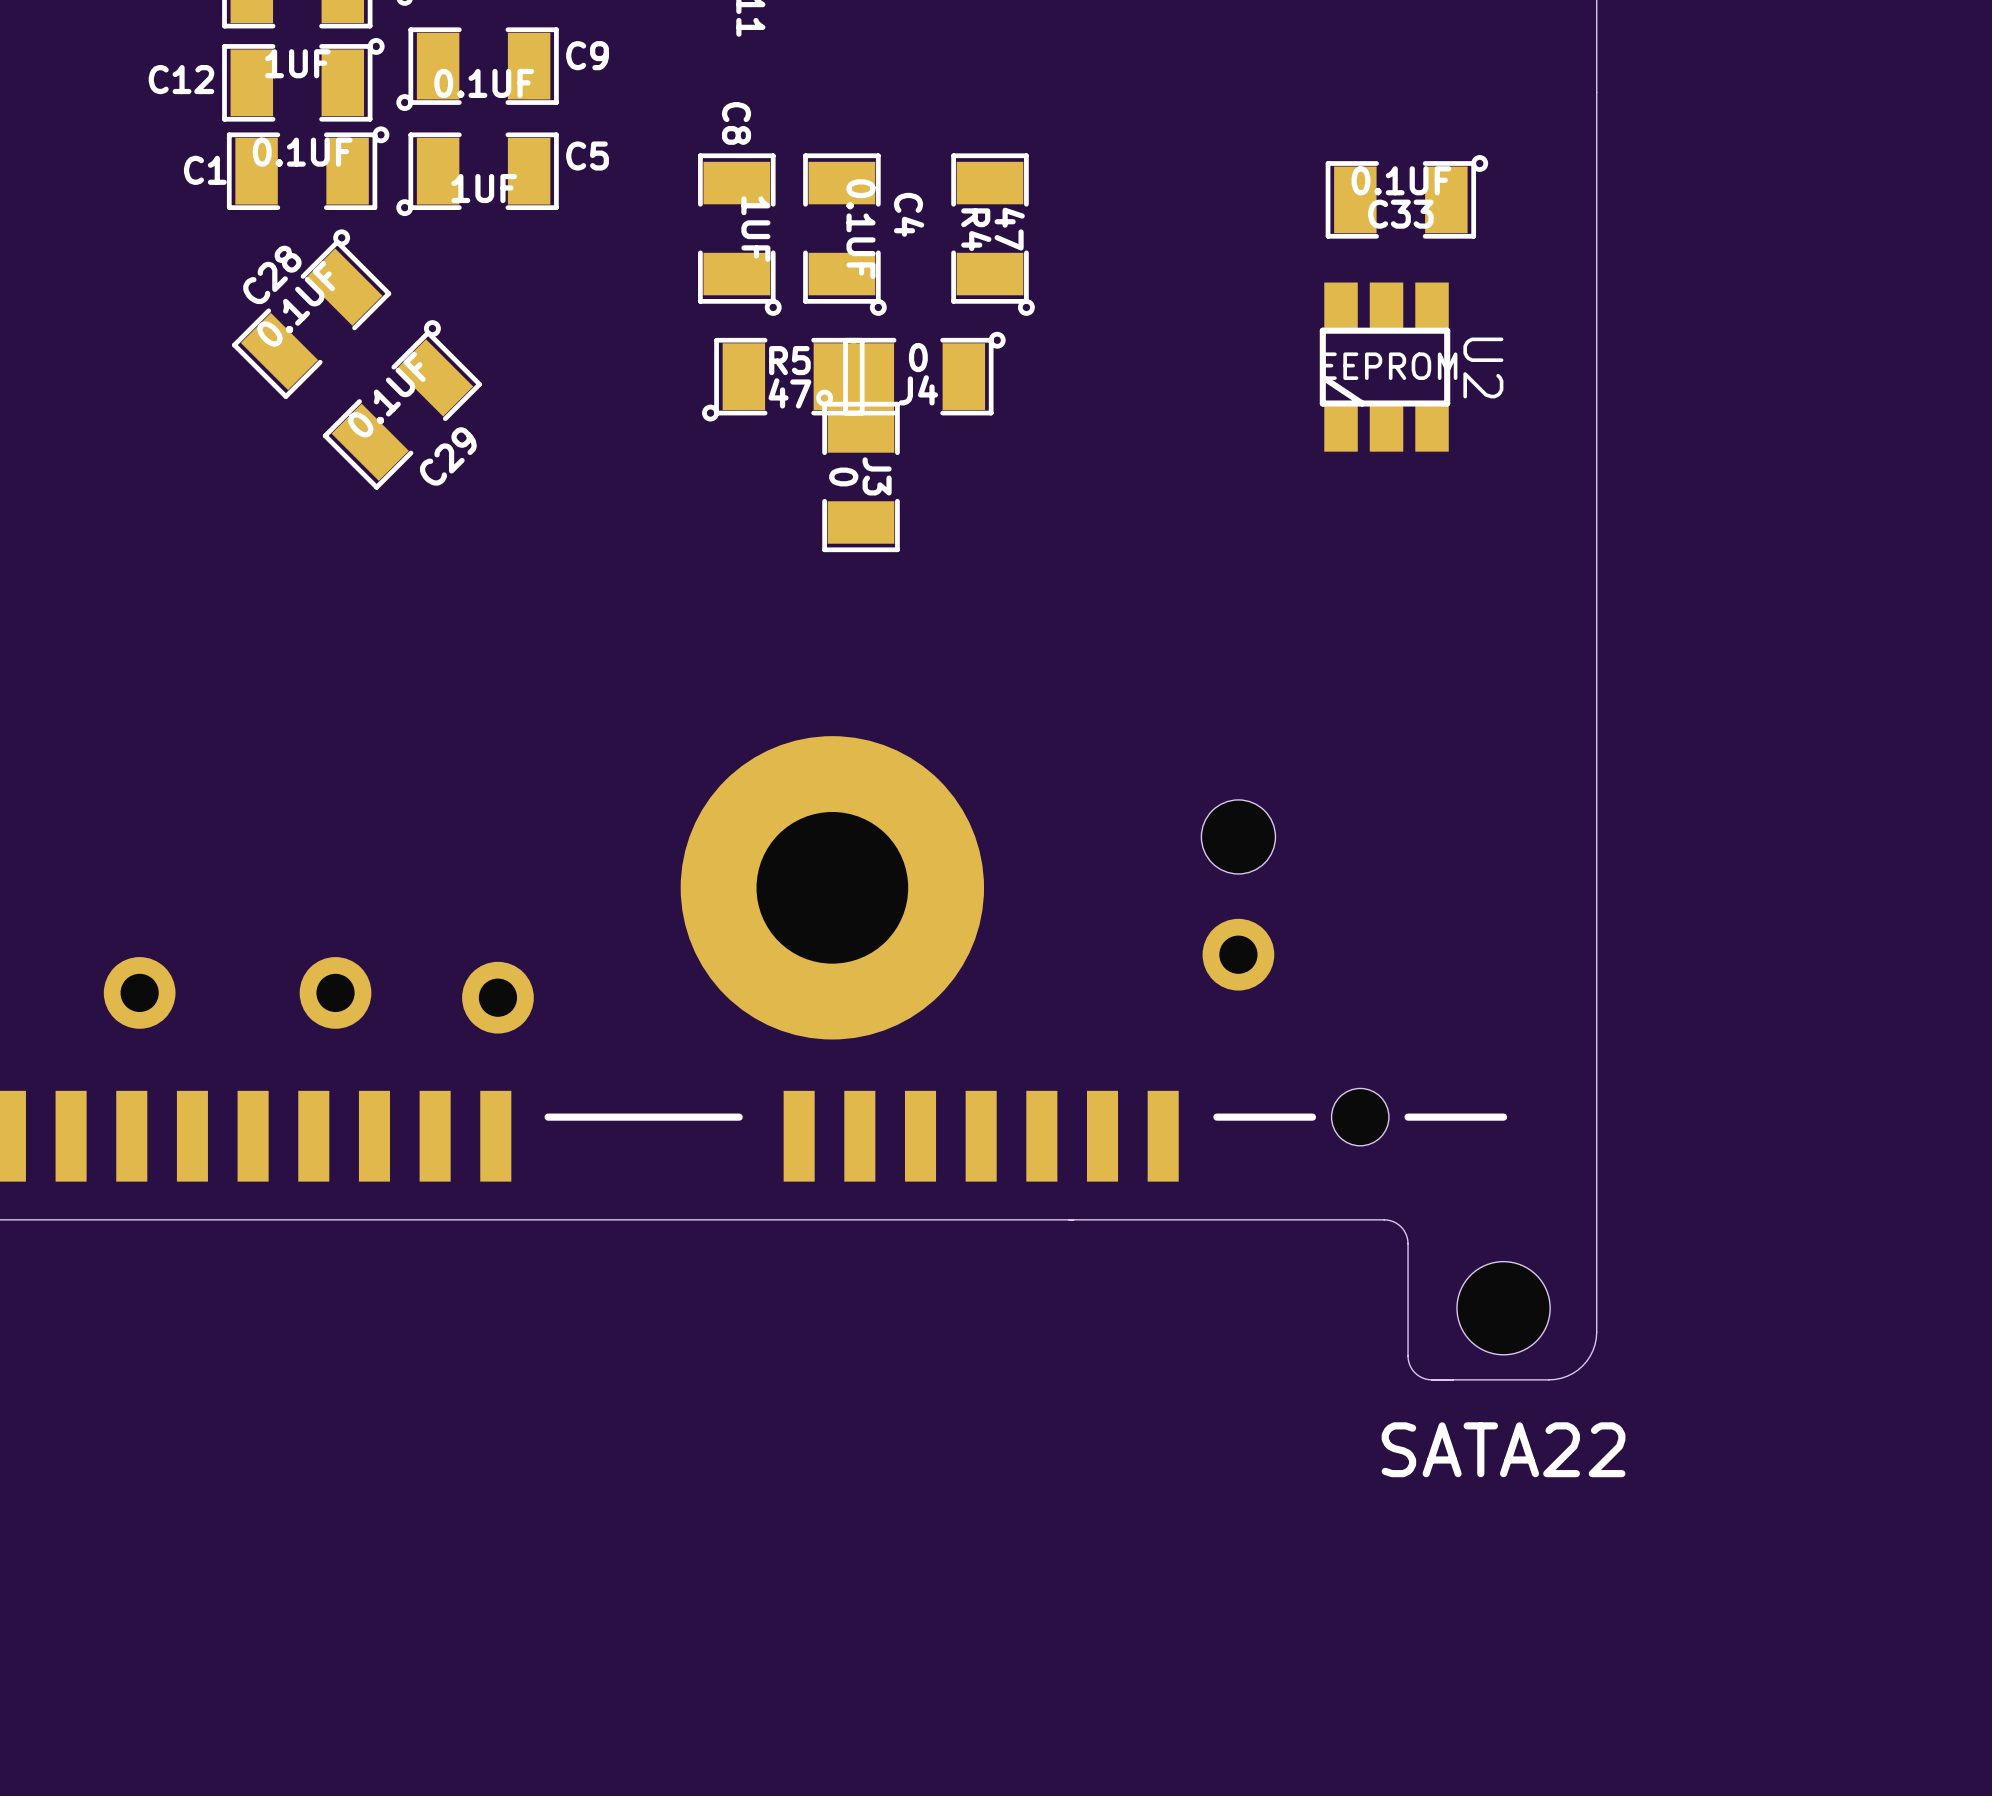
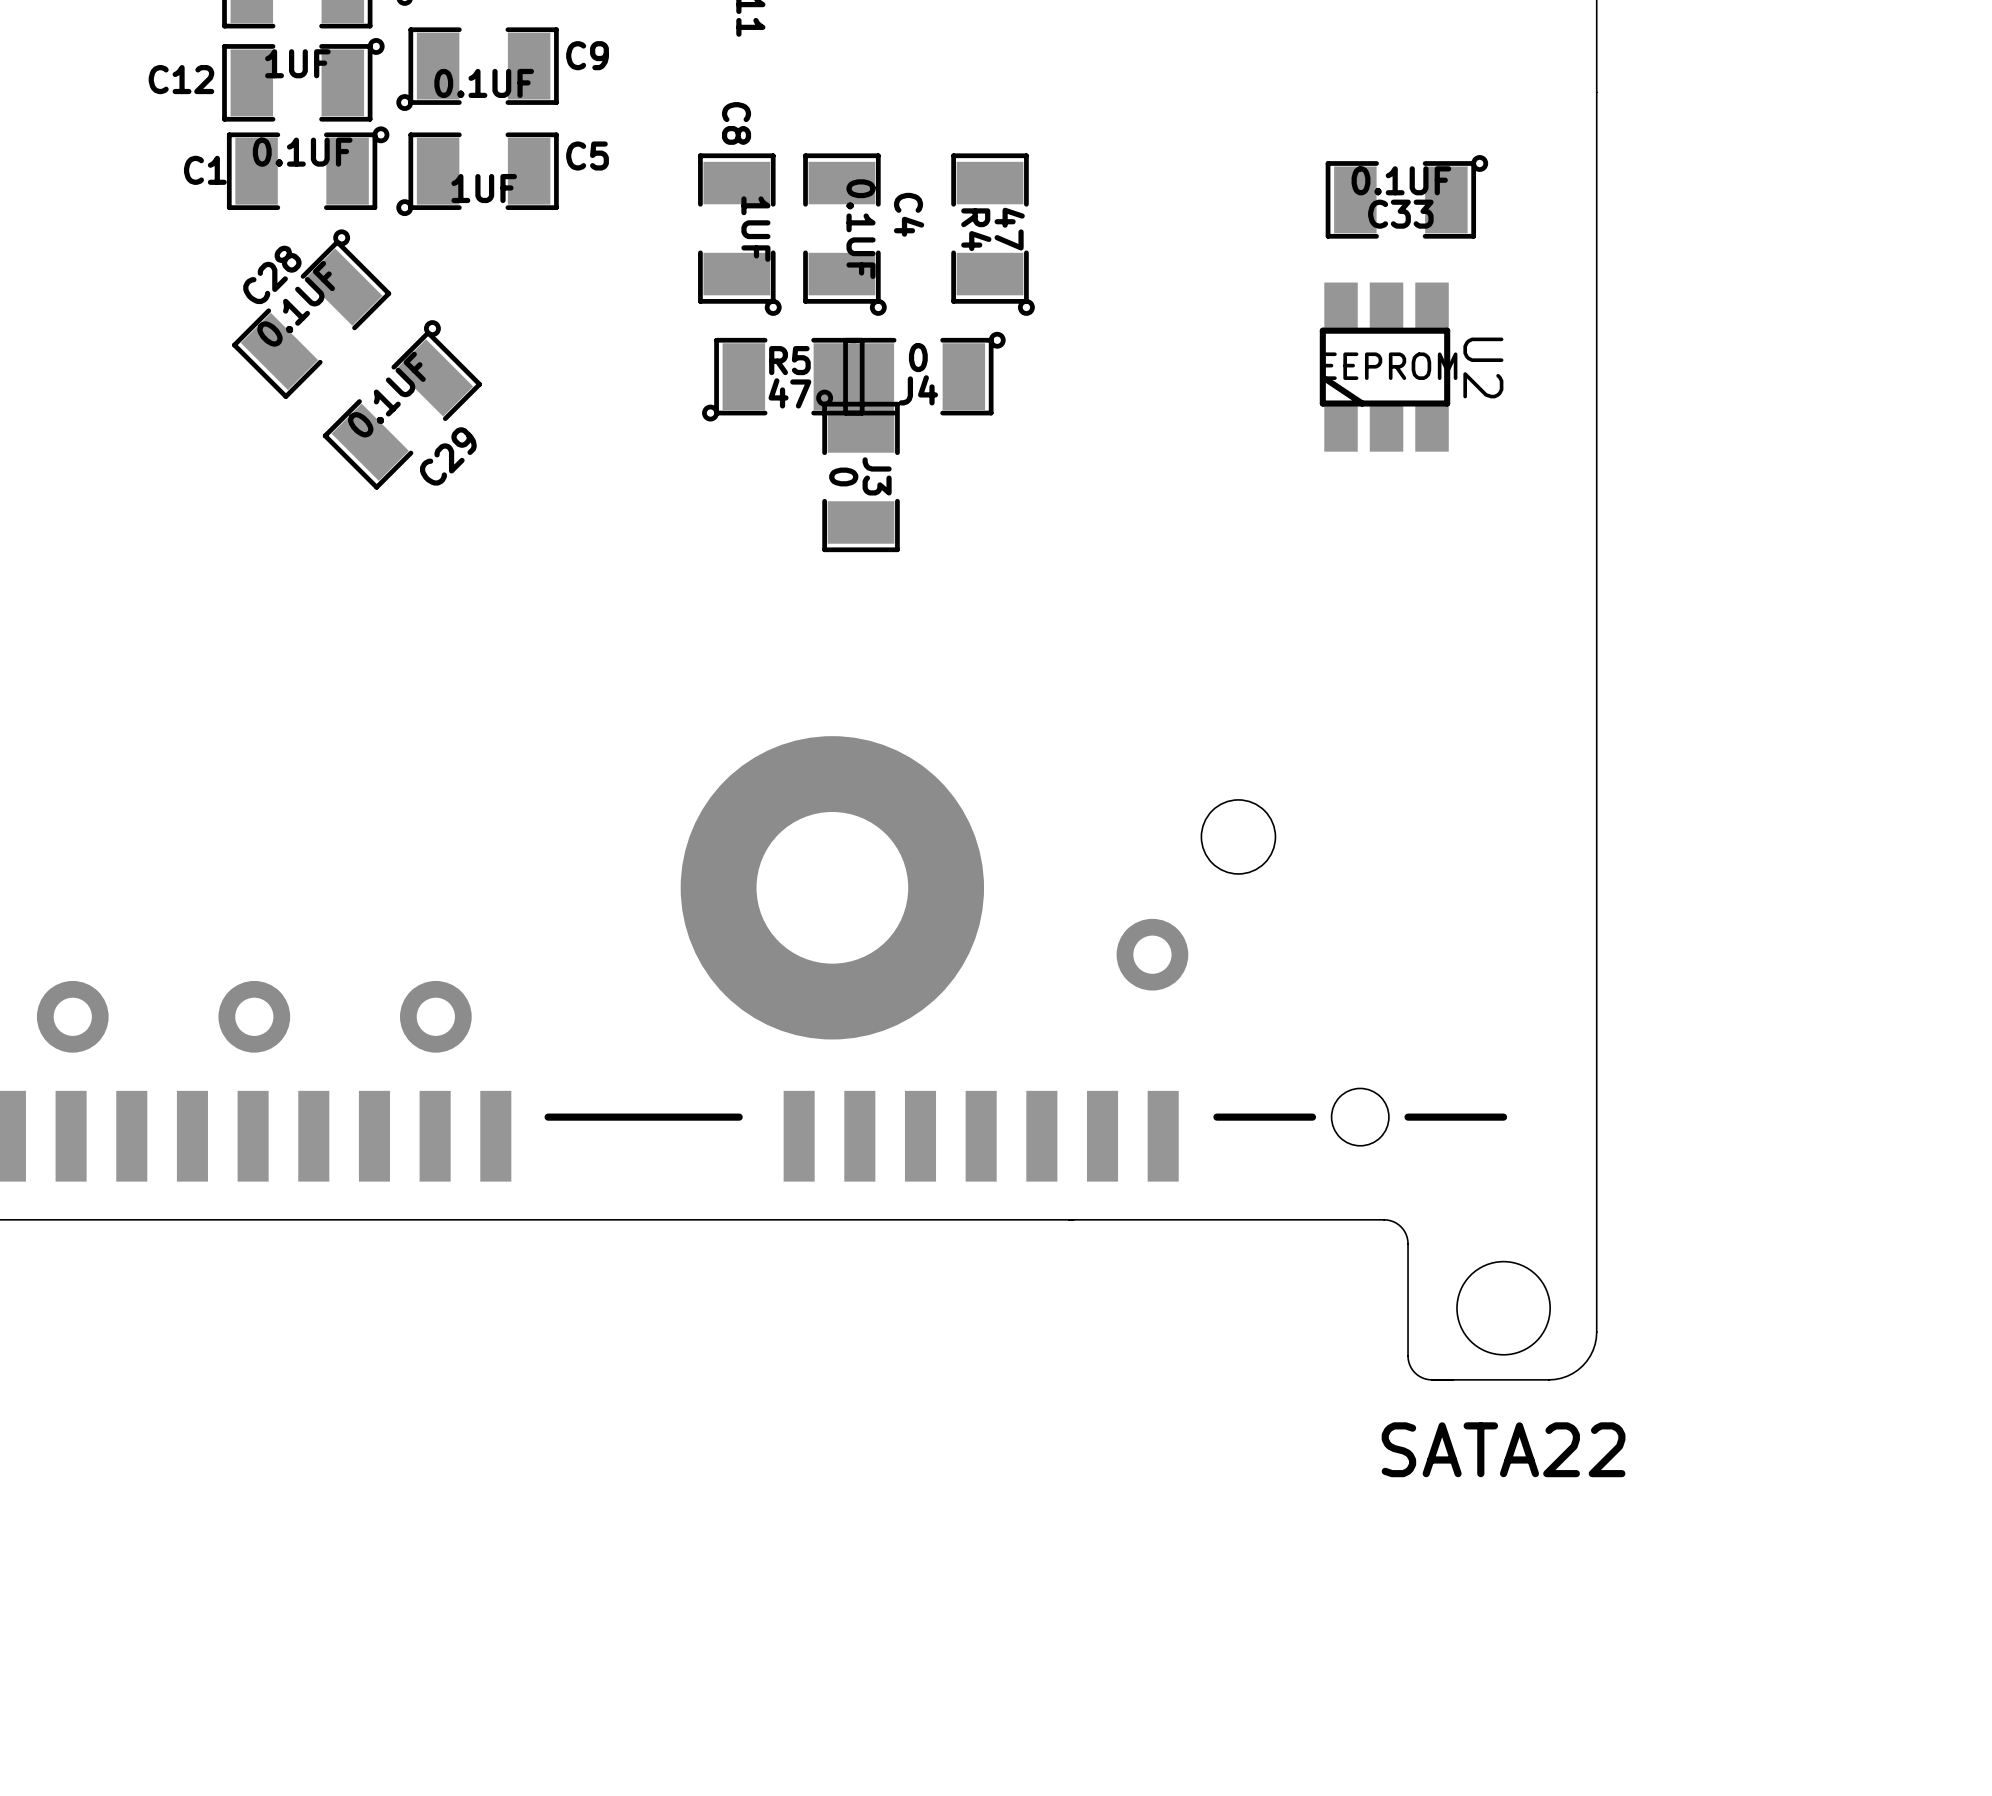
part position: (1238, 954) -> (1152, 954)
part: (139, 992) -> none
part: (335, 992) -> none
part: (497, 997) -> none
part: none -> (72, 1016)
part: none -> (254, 1016)
part: none -> (435, 1016)

